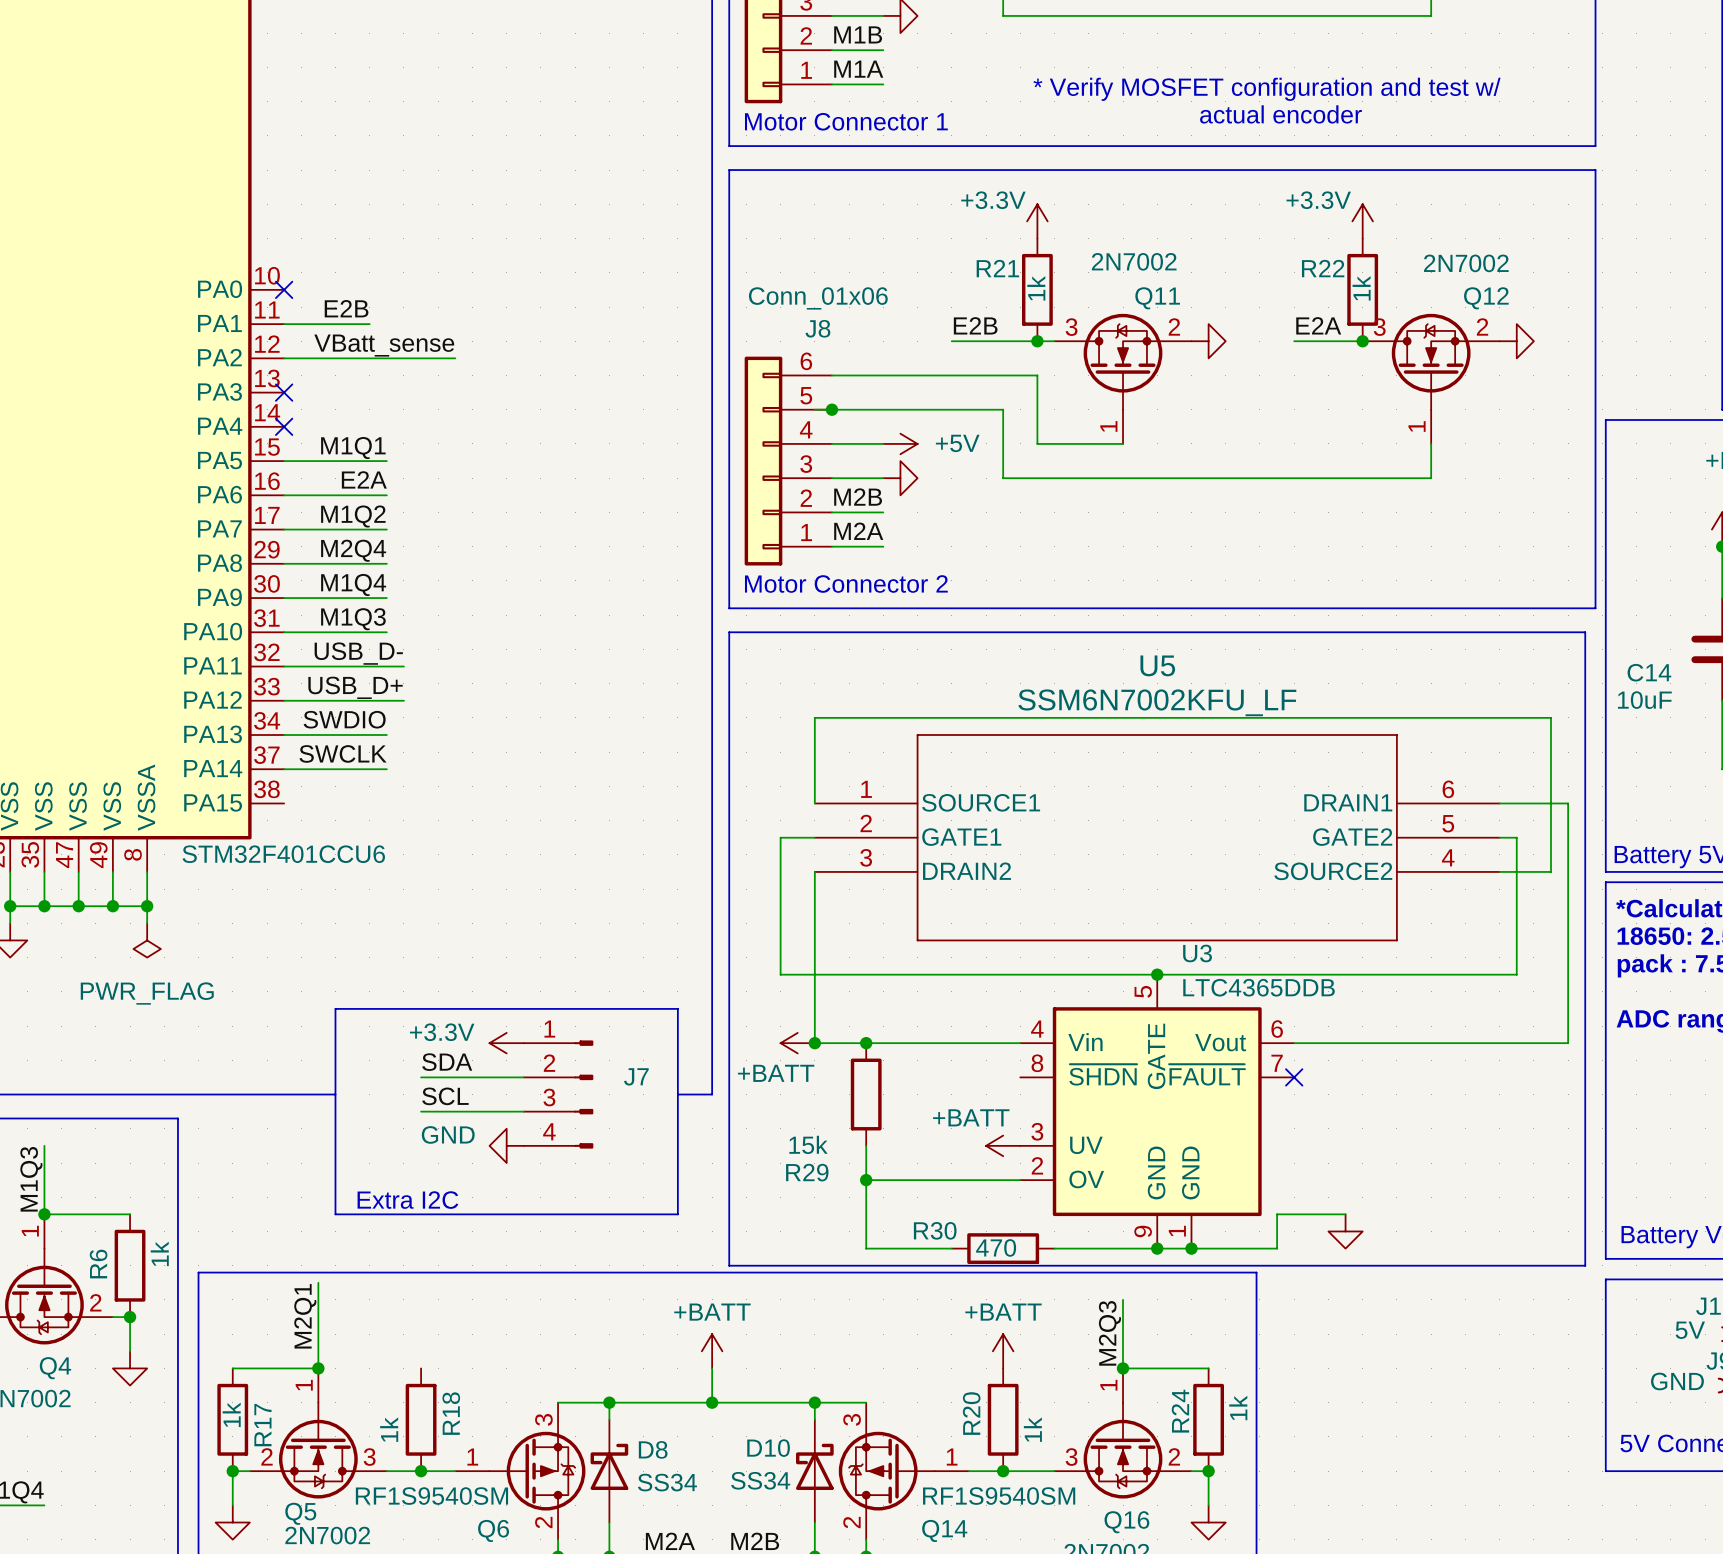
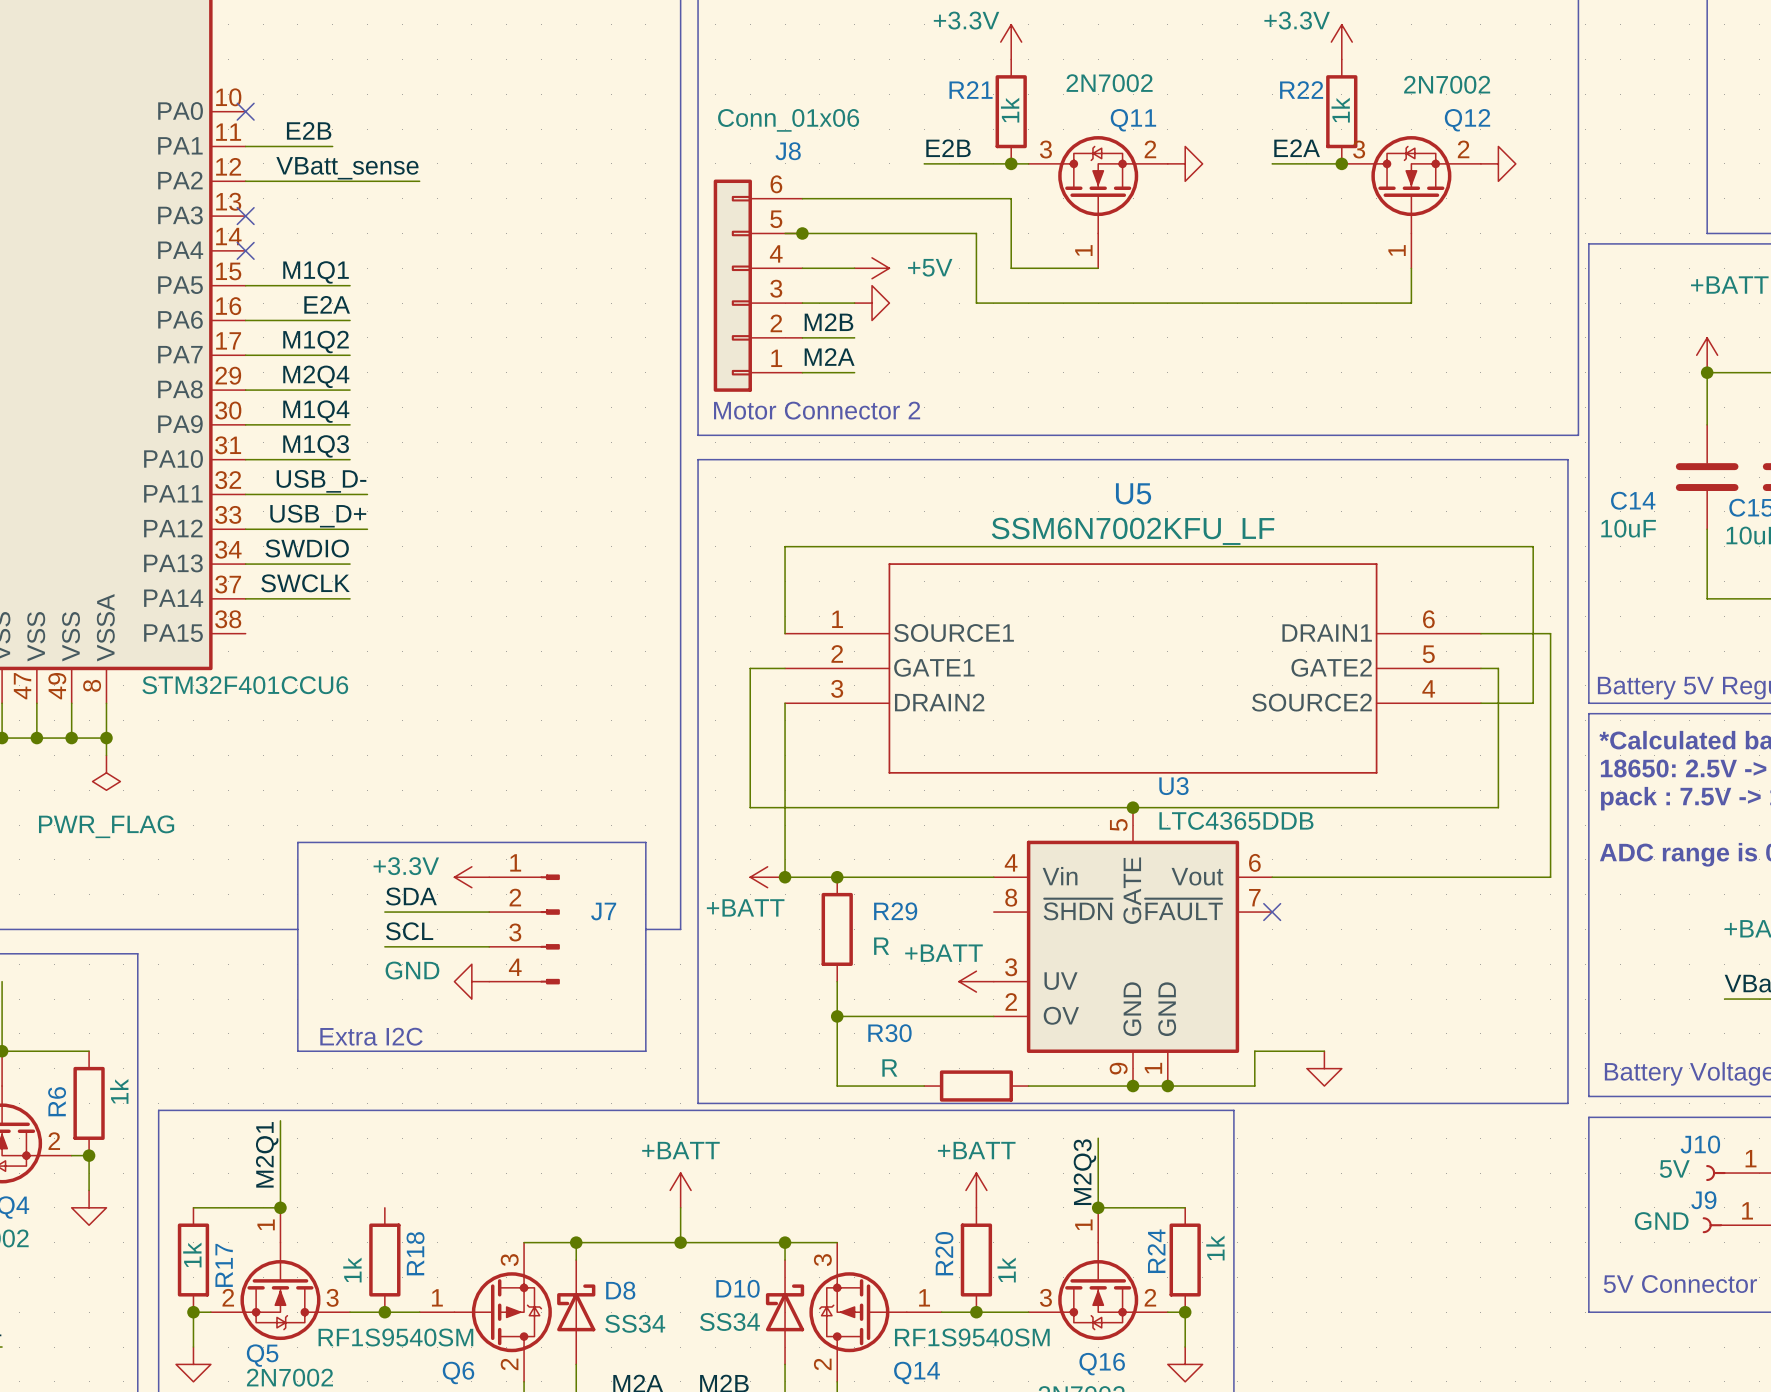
R29 value: 15k (808, 1144) -> R (881, 946)
R29 name position: R29 (807, 1172) -> R29 (895, 911)
R30 name position: R30 (935, 1230) -> R30 (889, 1033)
R30 value: 470 (996, 1247) -> R (889, 1067)

